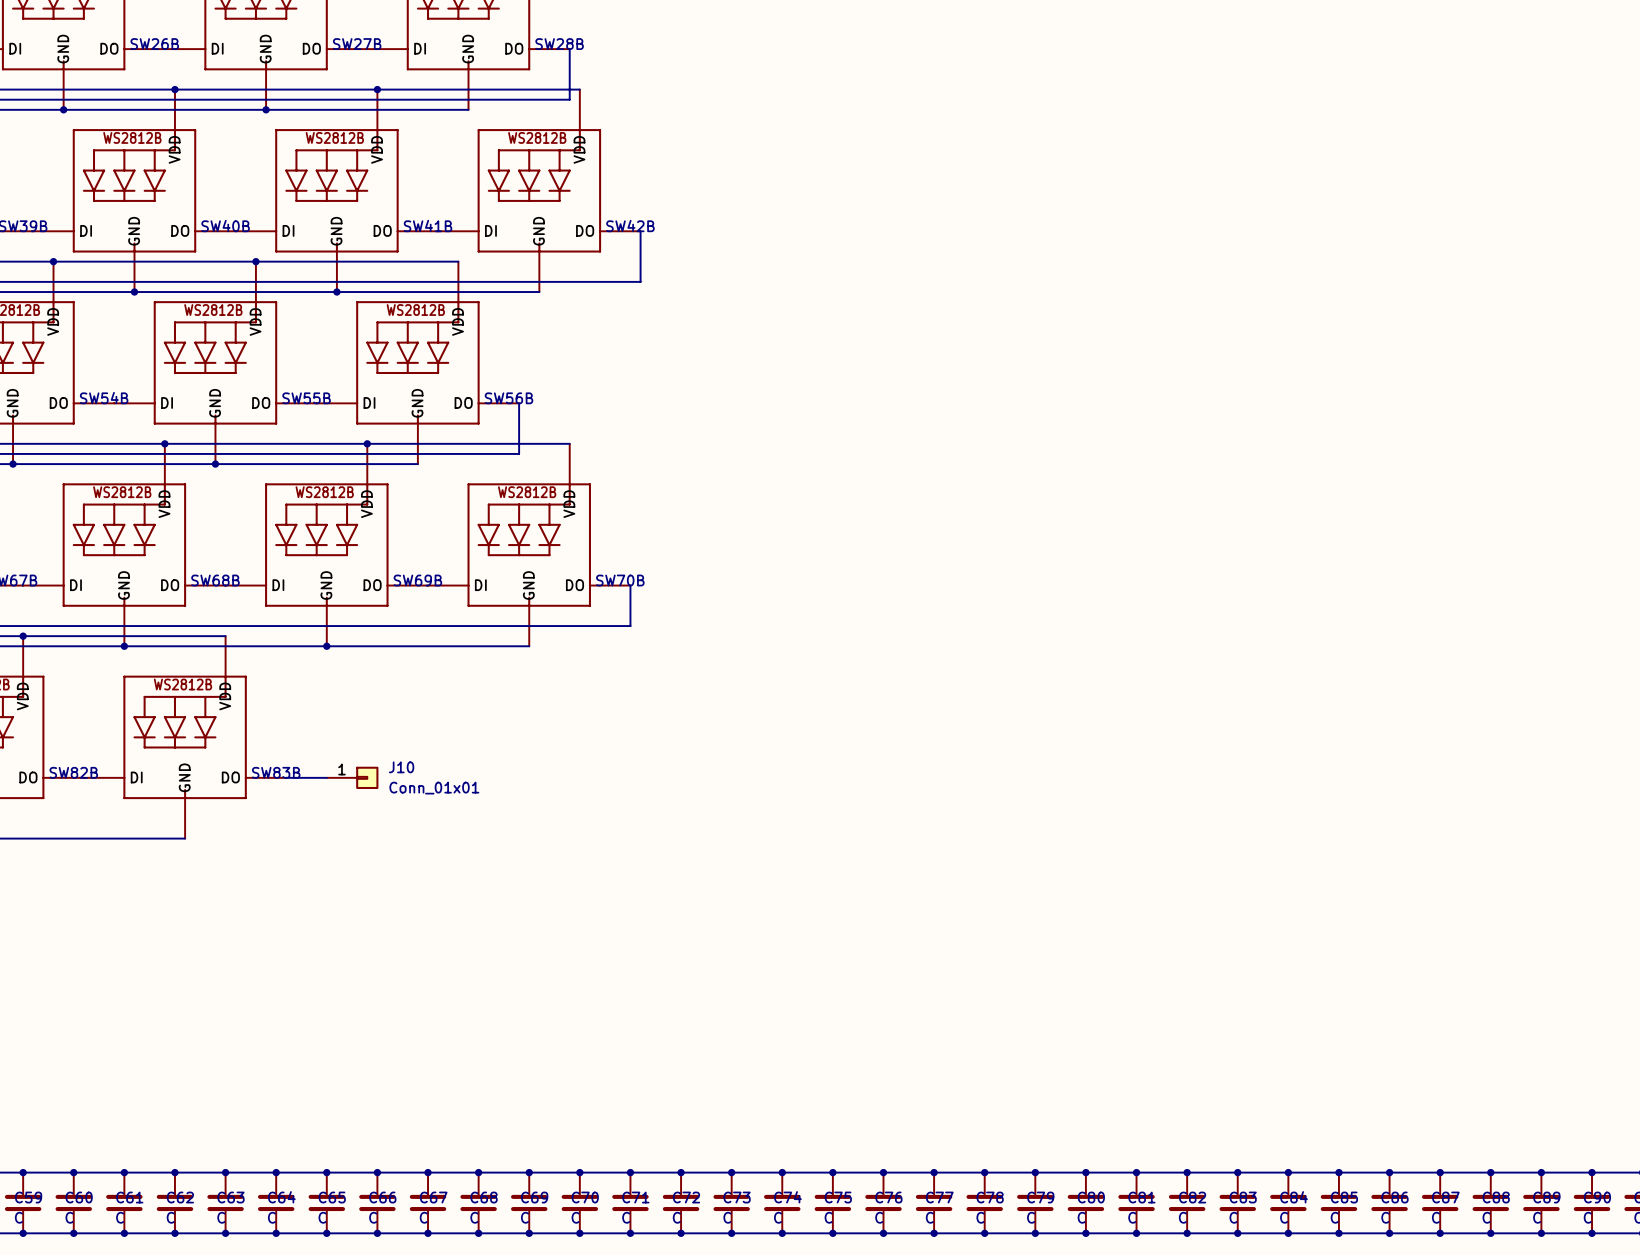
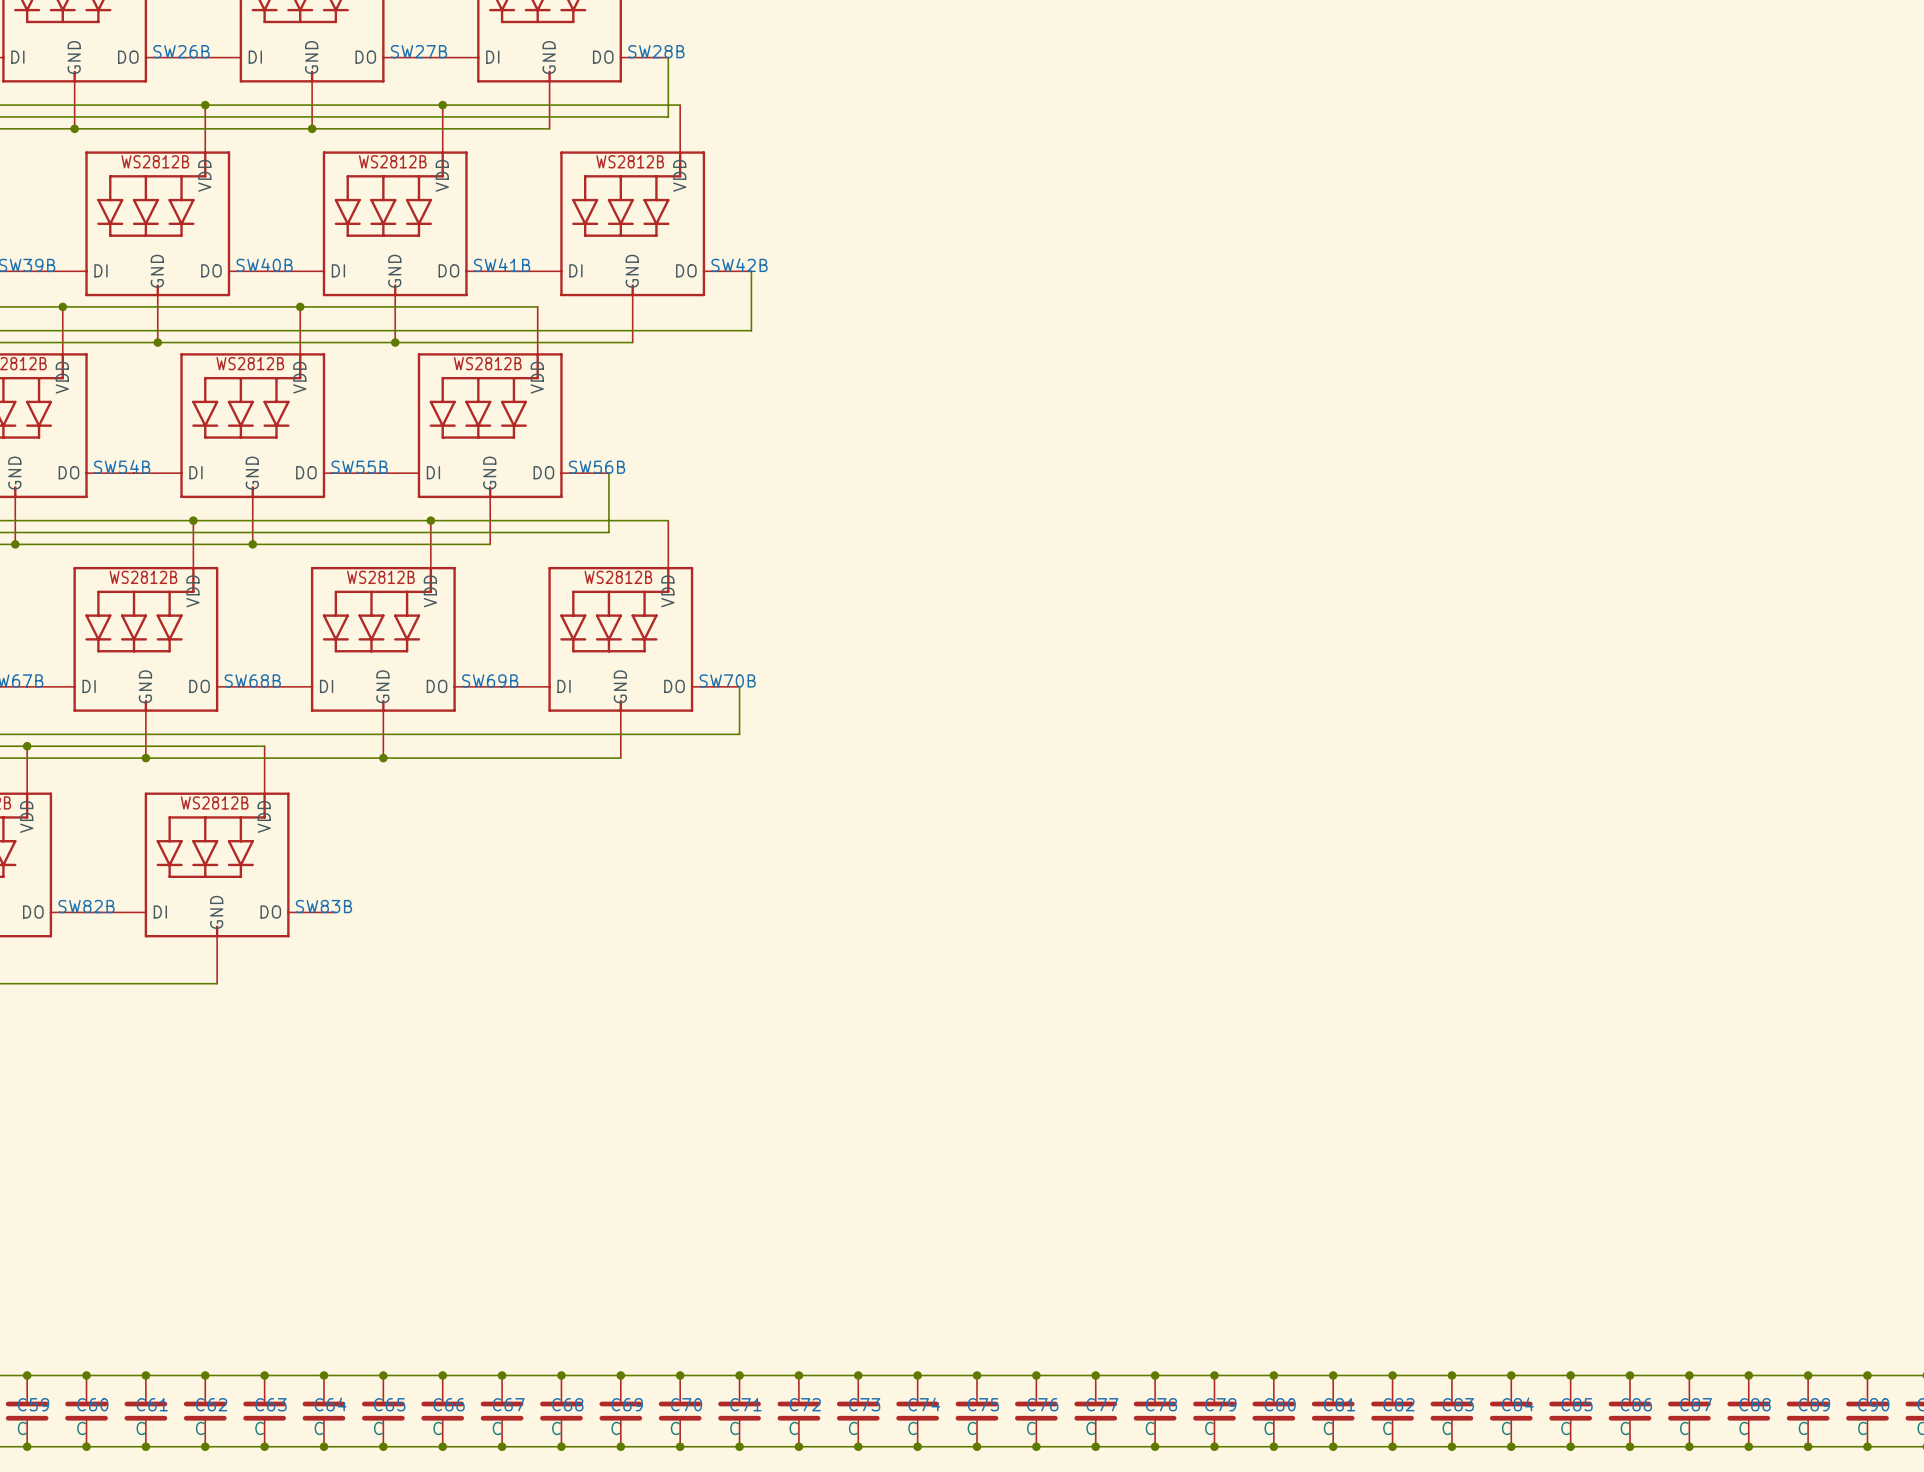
wire: (286, 777) (326, 777) -> none
J10: Conn_01x01 (352, 777) -> none

